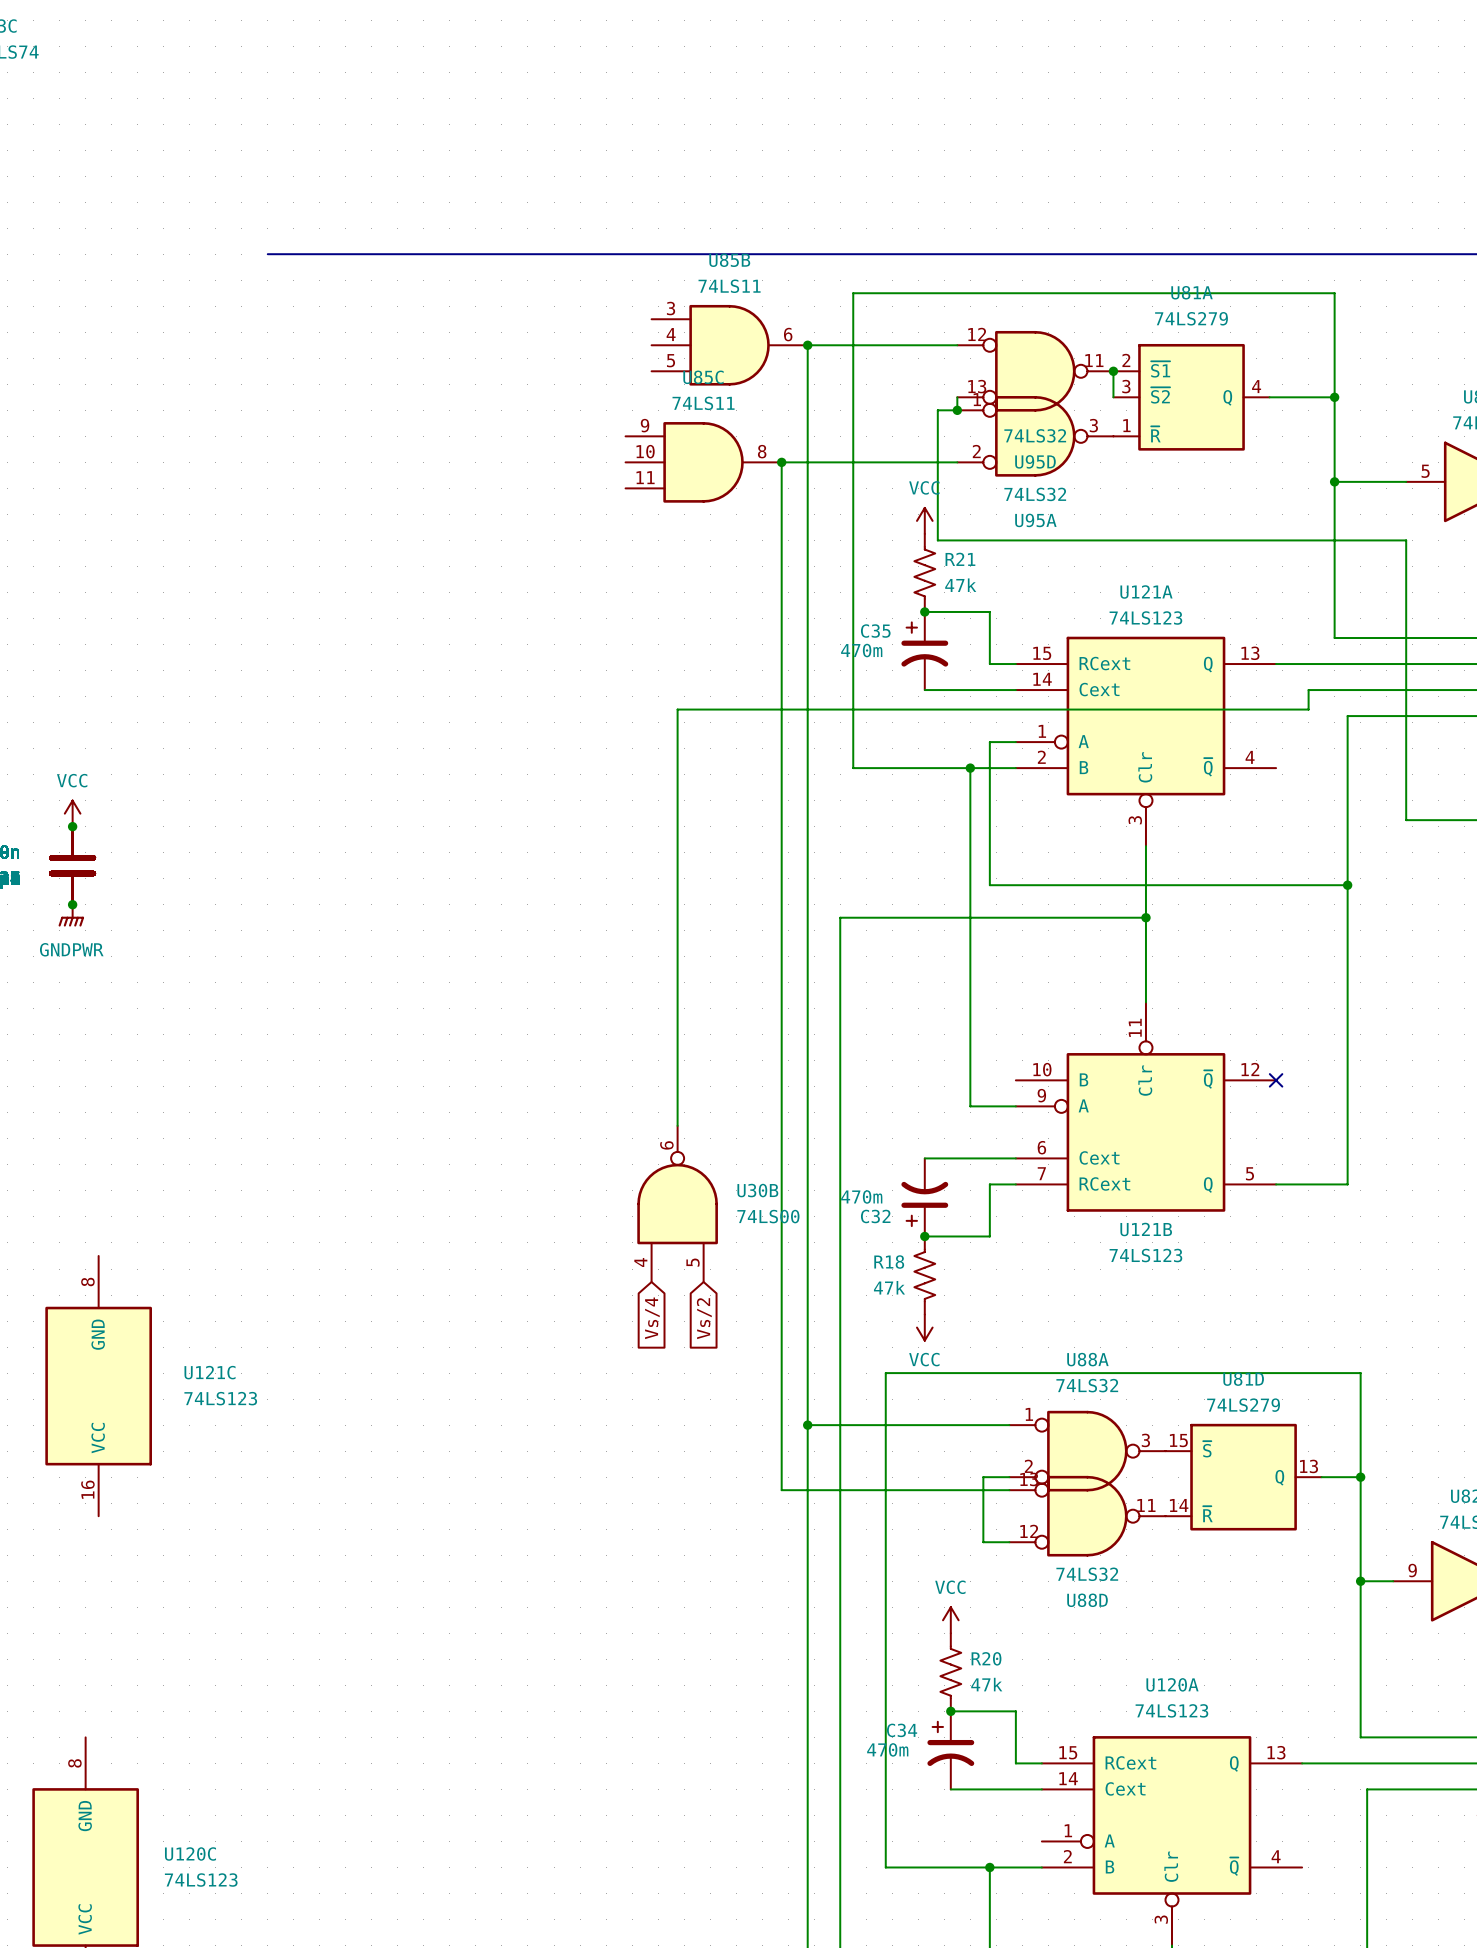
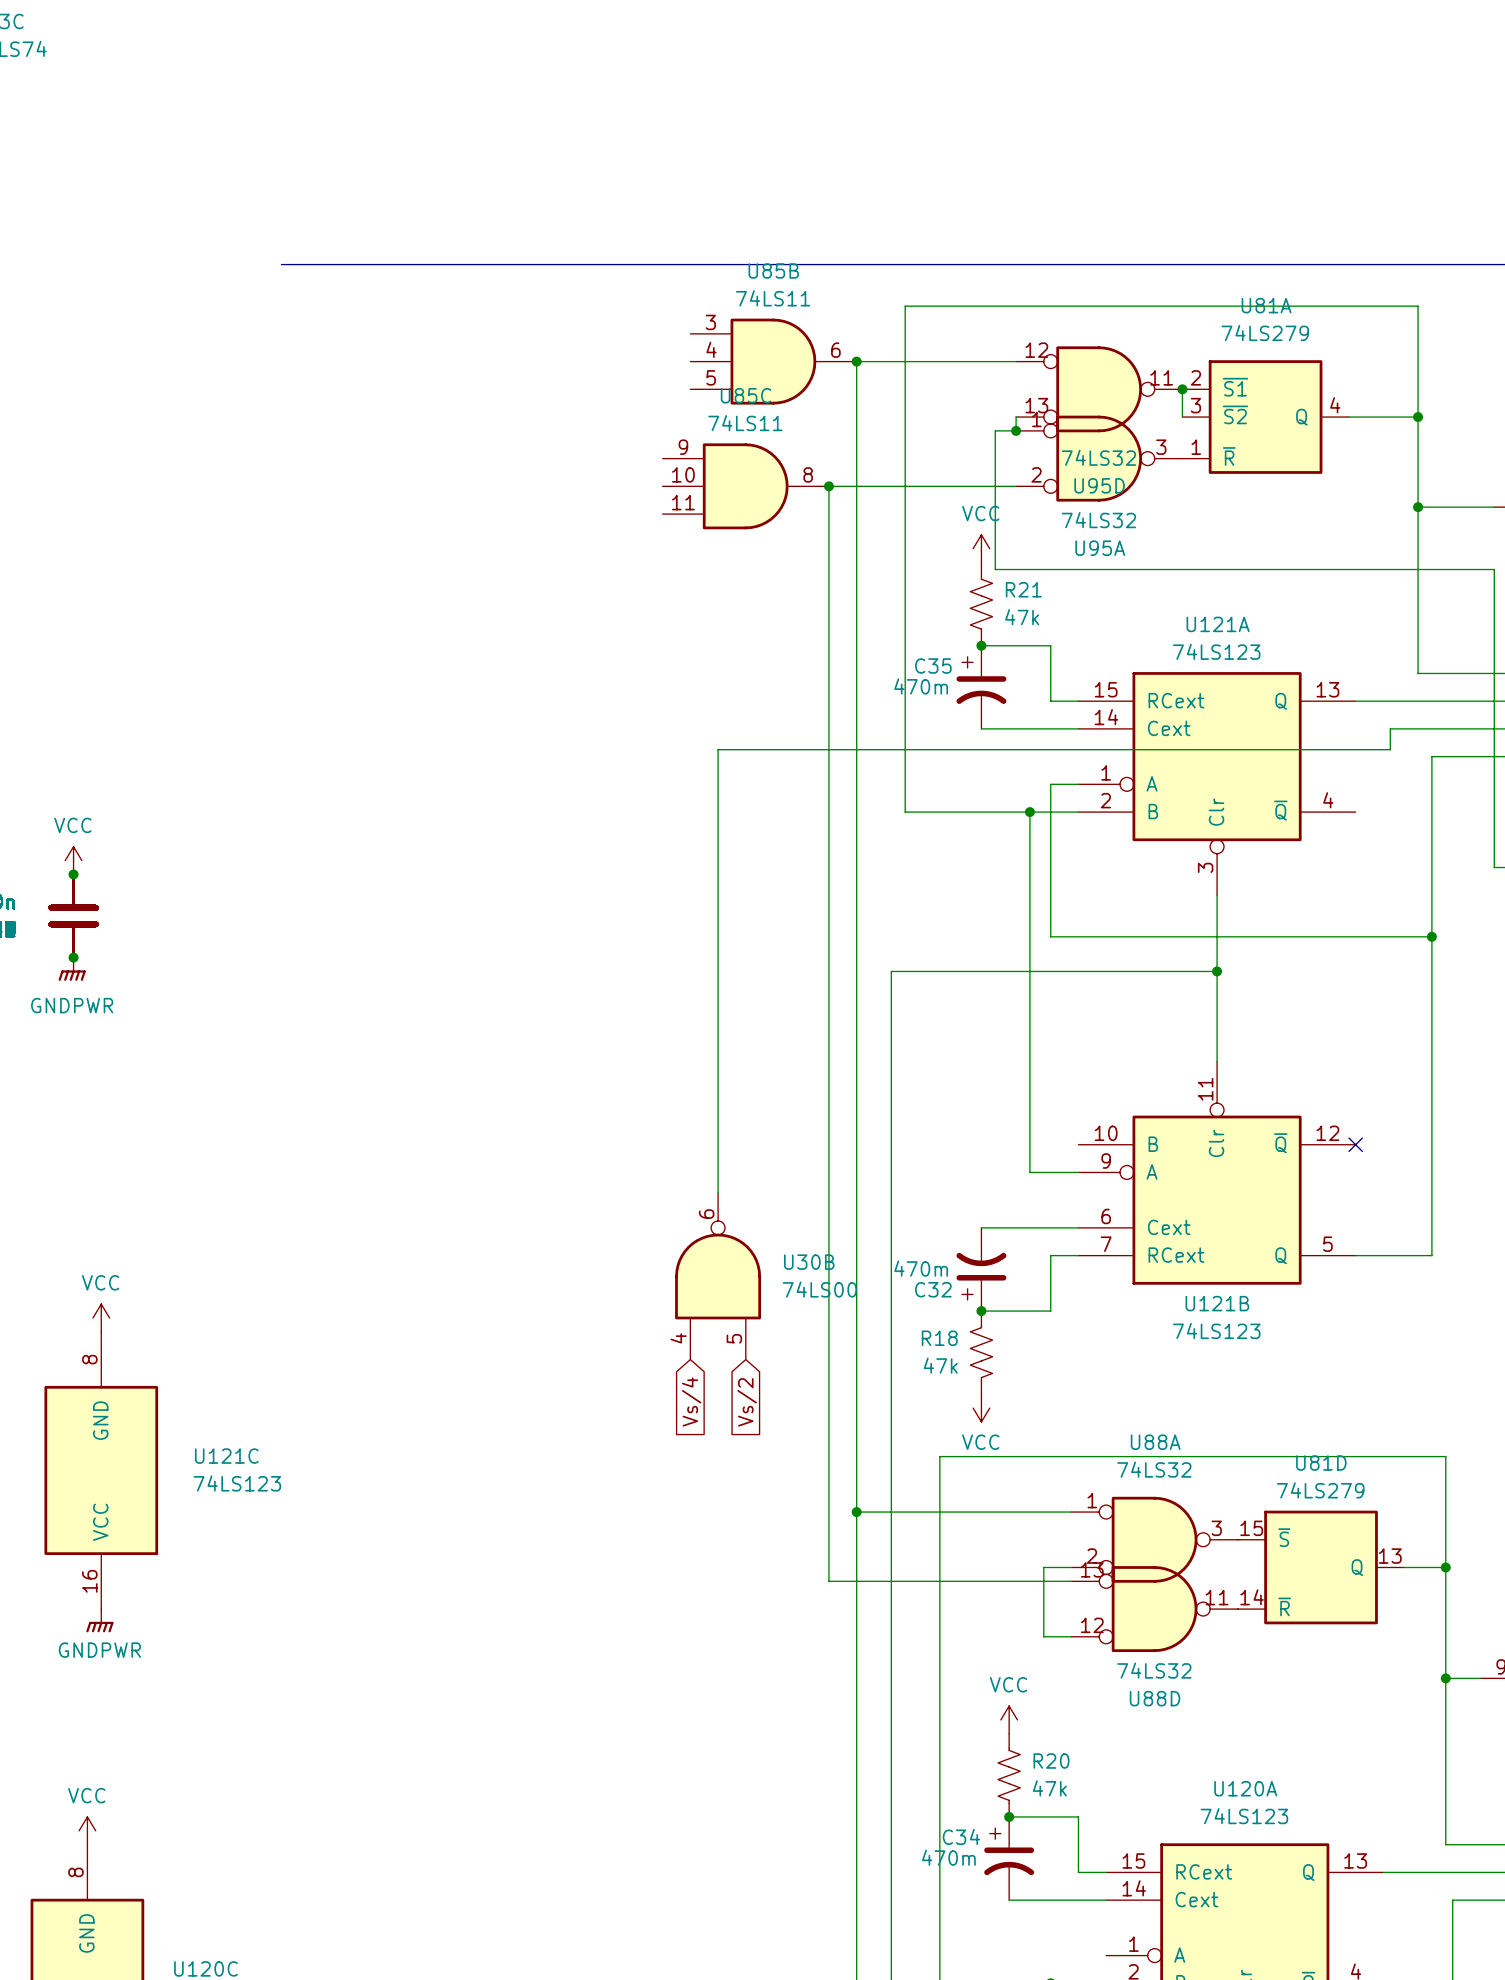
power symbol: none -> VCC (101, 1317)
power symbol: none -> GNDPWR (99, 1620)
power symbol: none -> VCC (87, 1830)

